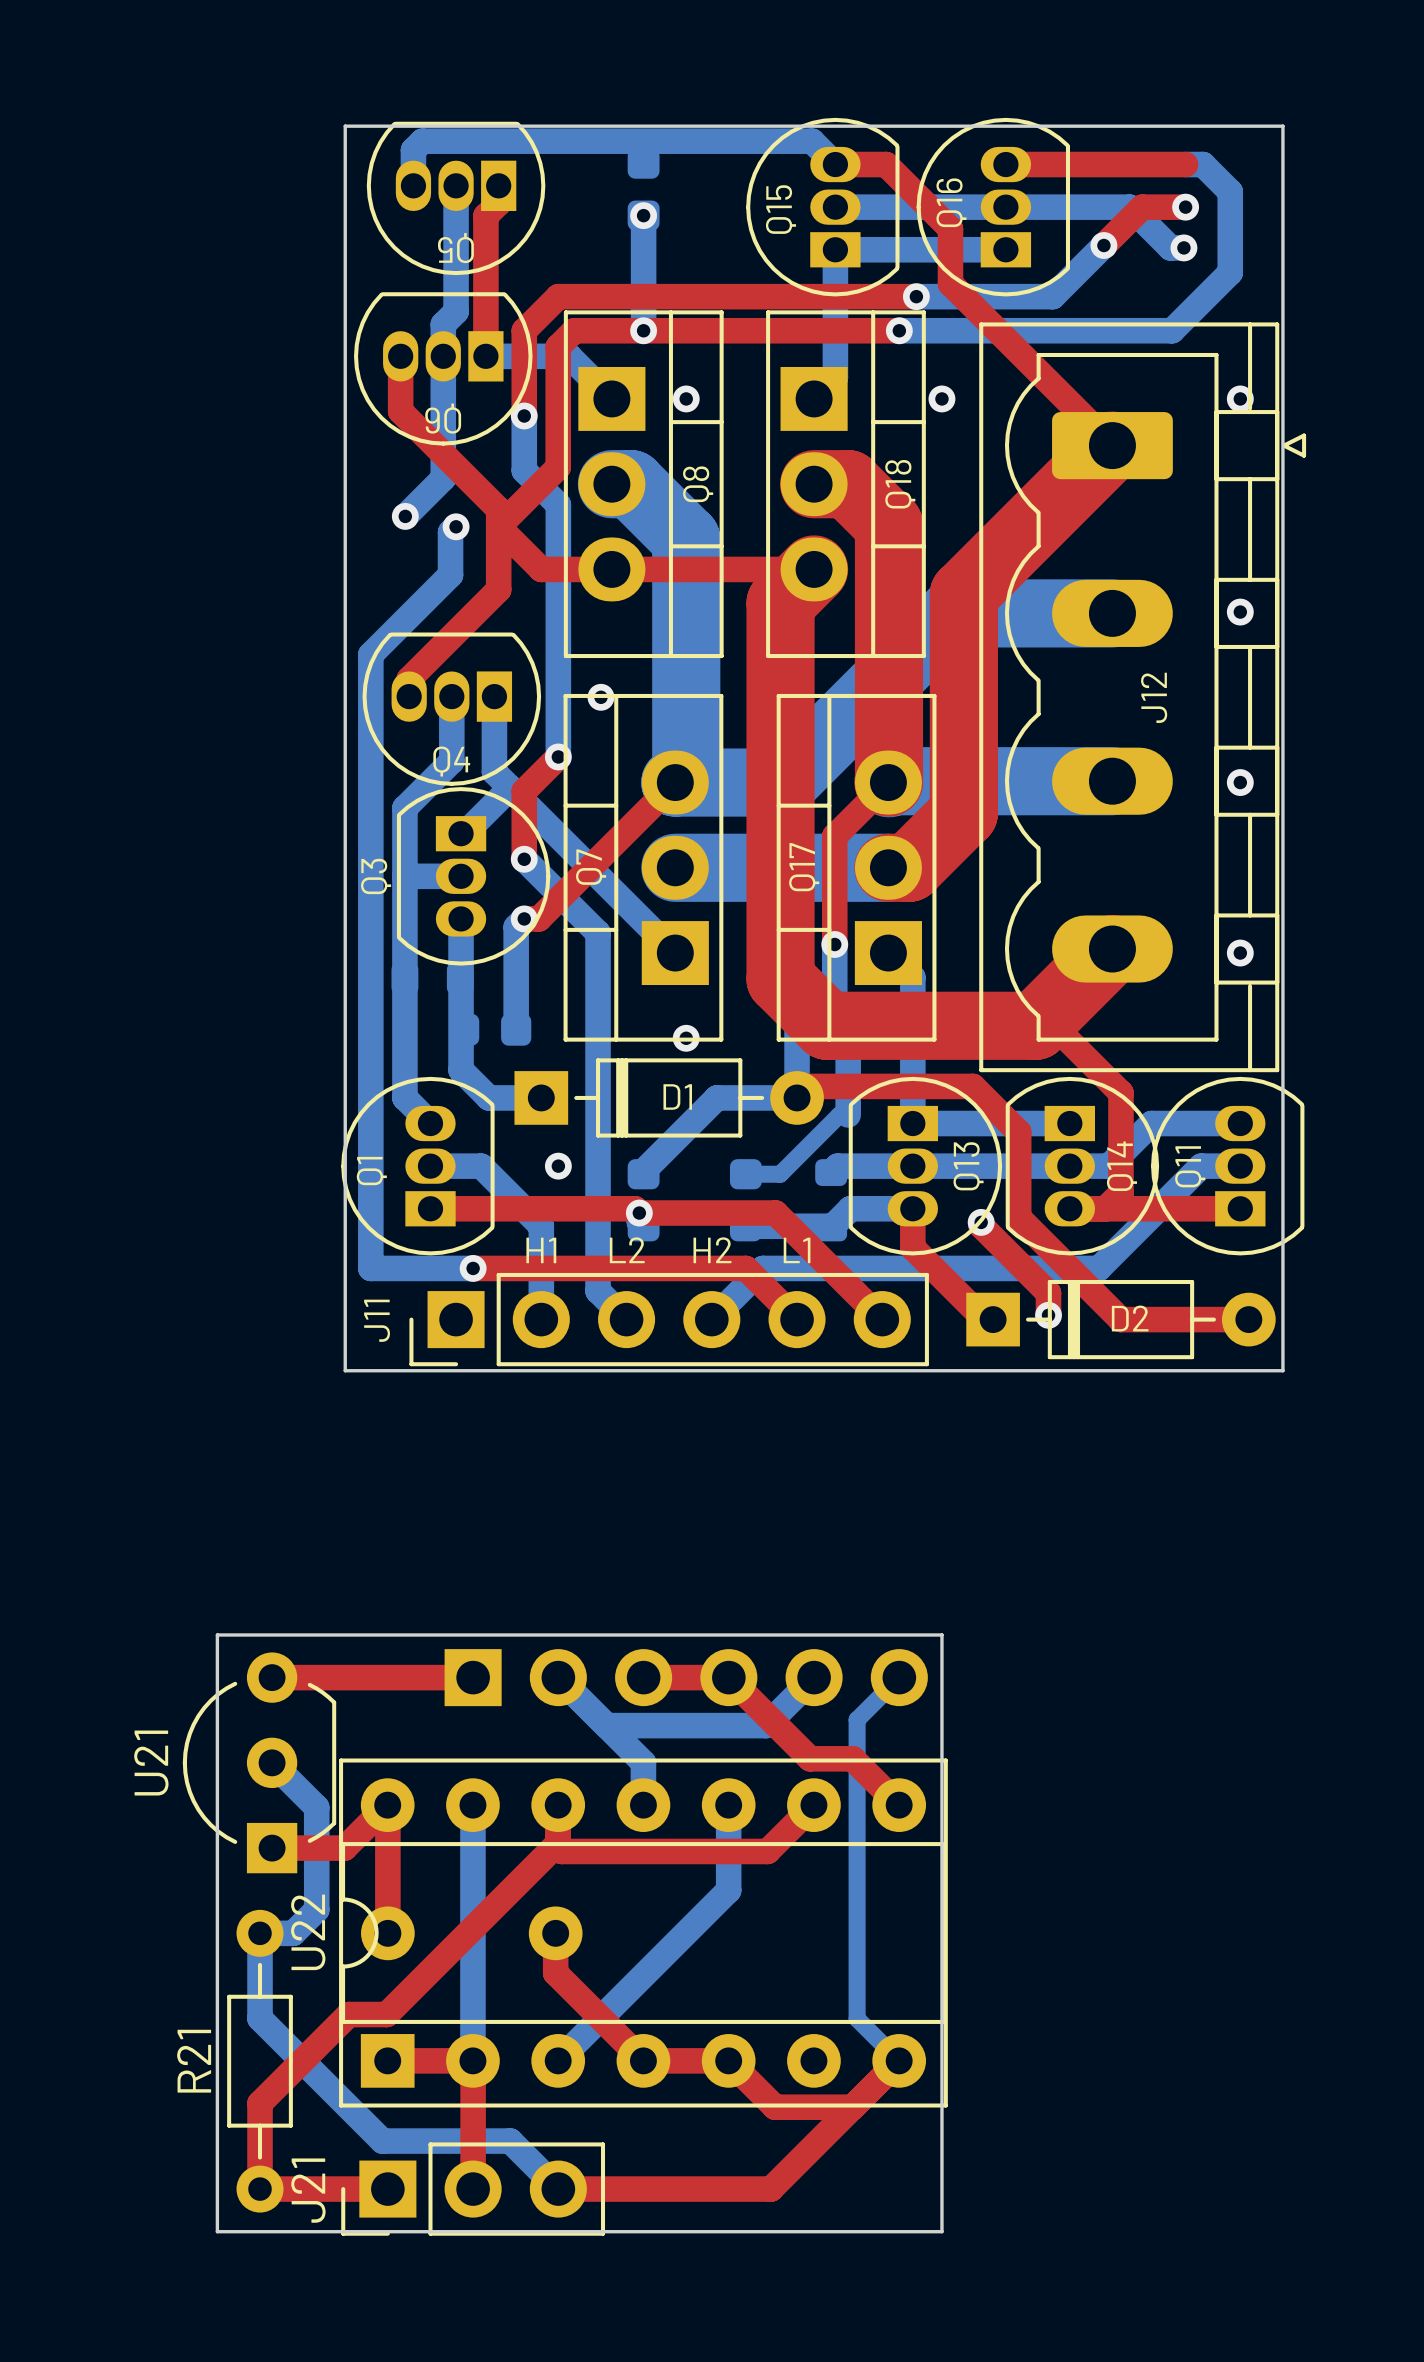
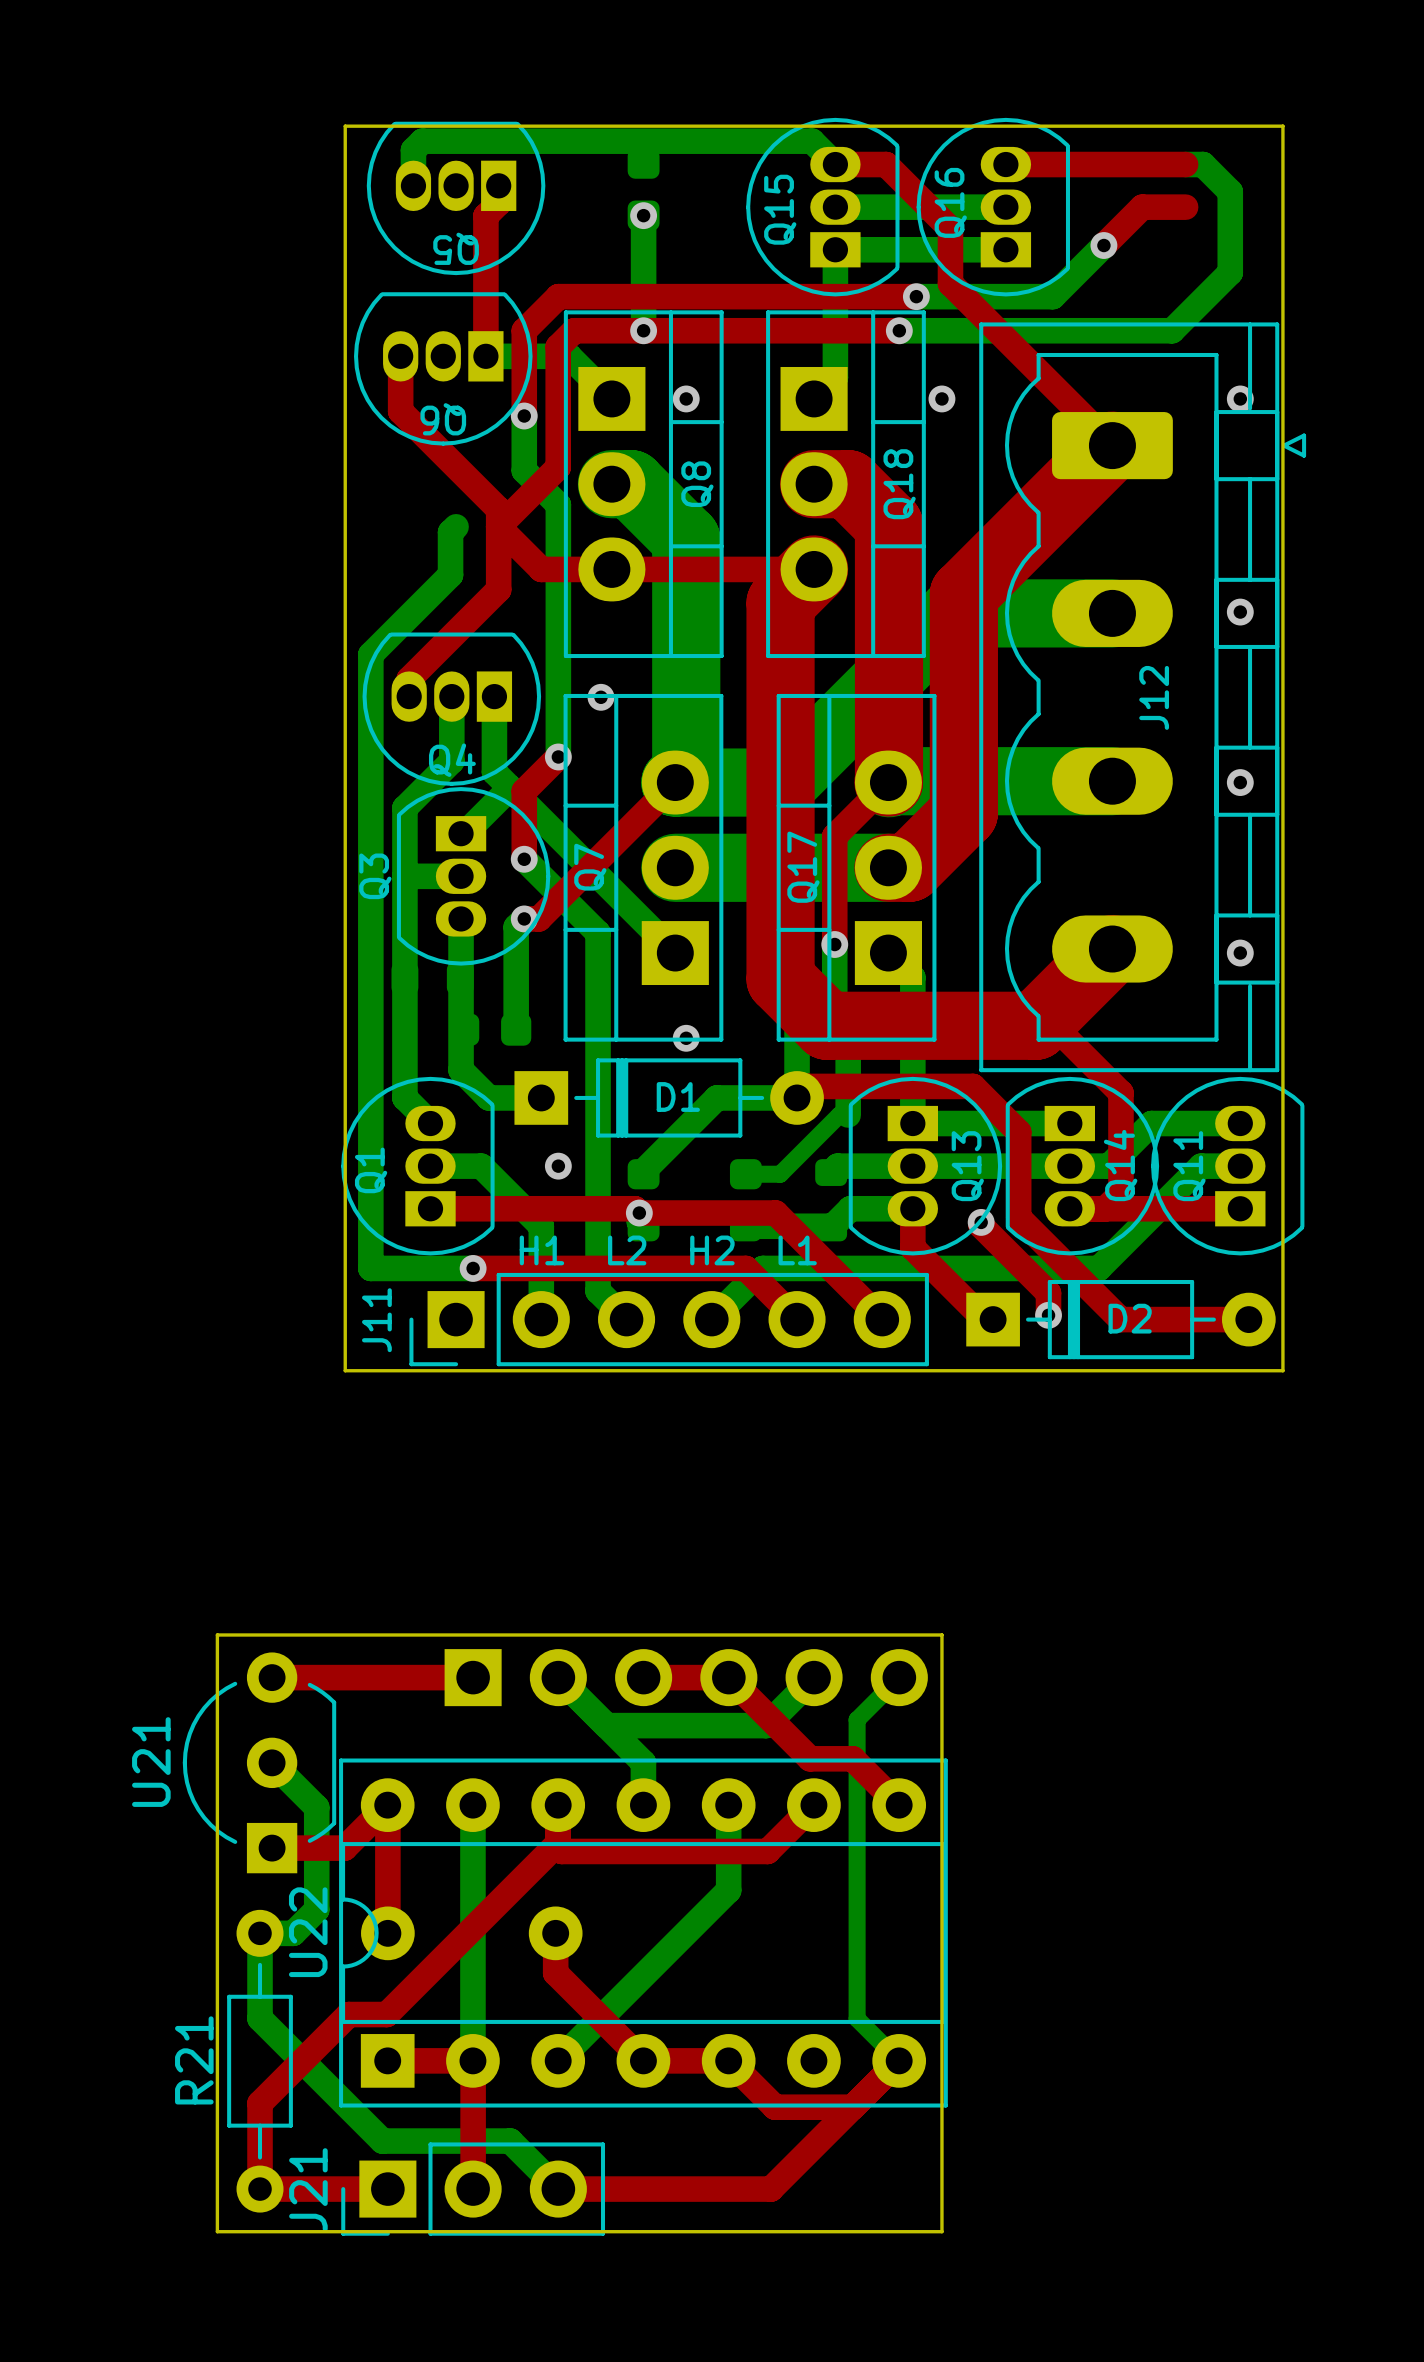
bottom track: (456, 185) (456, 311) (443, 324) (443, 478) (405, 516) -> none
bottom track: (1005, 207) (1129, 207) (1170, 247) (1183, 247) -> none
via: (1185, 207) -> none
via: (1183, 247) -> none
via: (405, 516) -> none
via: (456, 526) -> none

